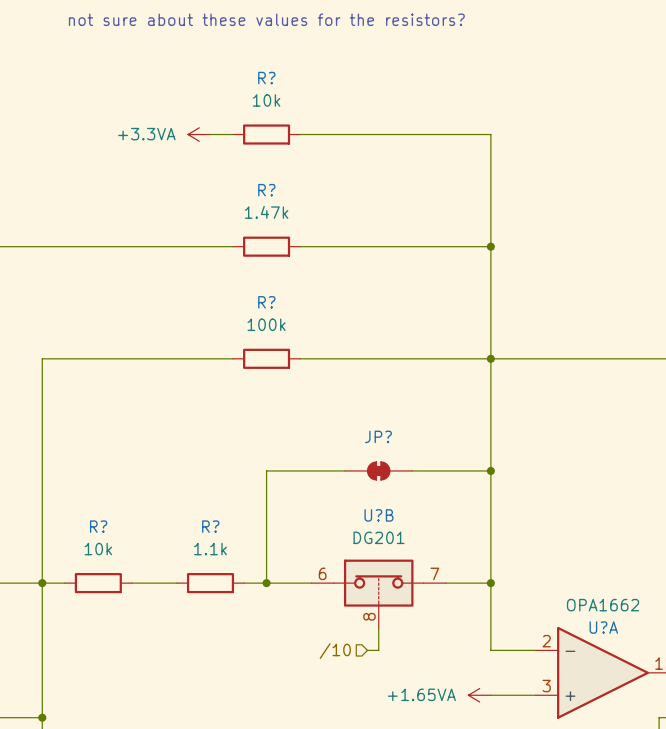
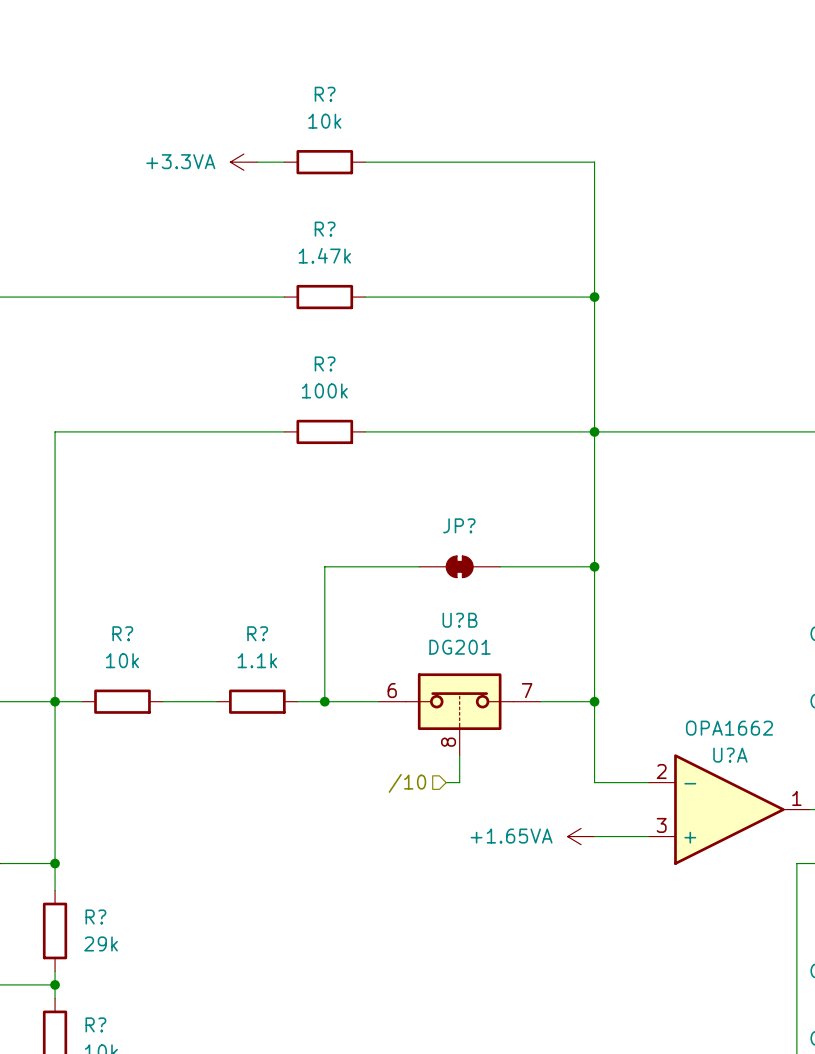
text: not sure about these values for the resistors? (266, 19) -> none

